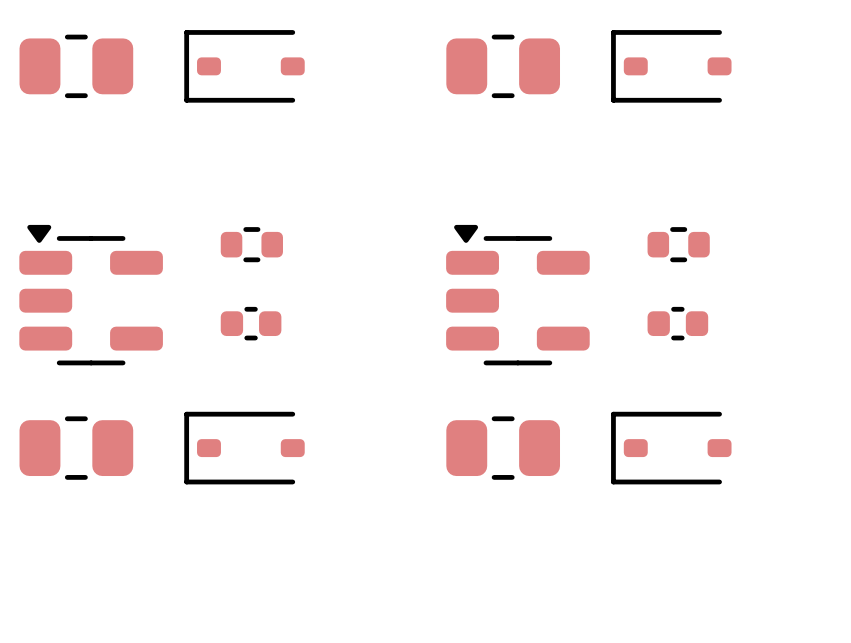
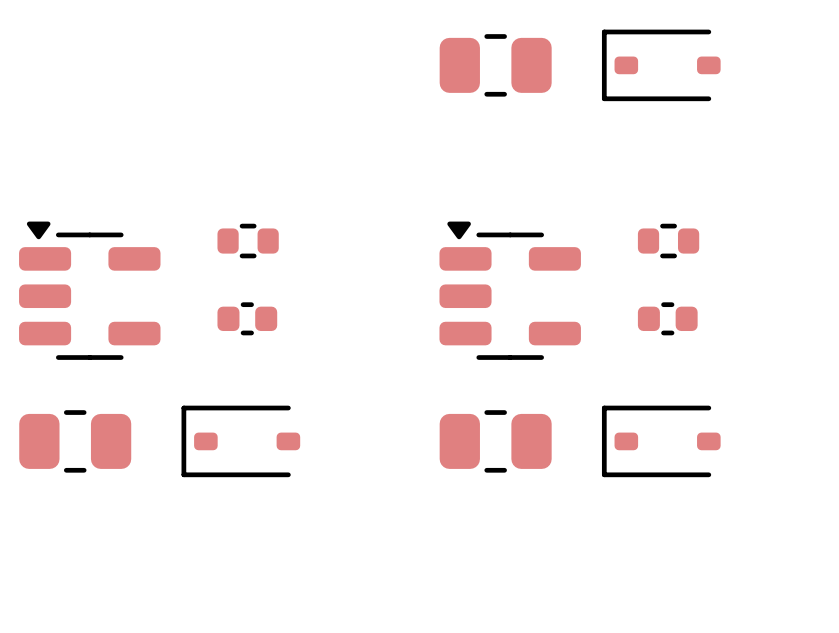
part: (76, 66) -> none
part: (244, 66) -> none

